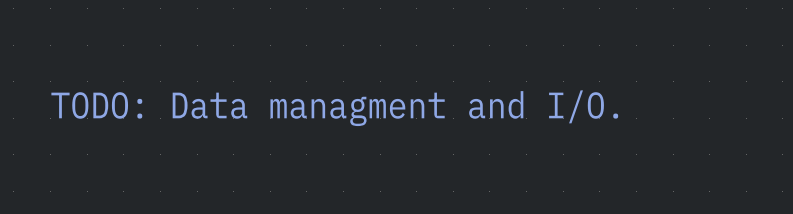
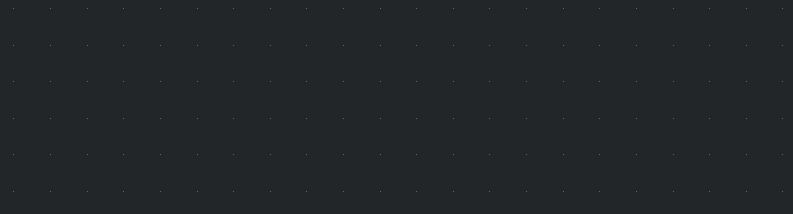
text: TODO: Data managment and I/O. (334, 108) -> none

